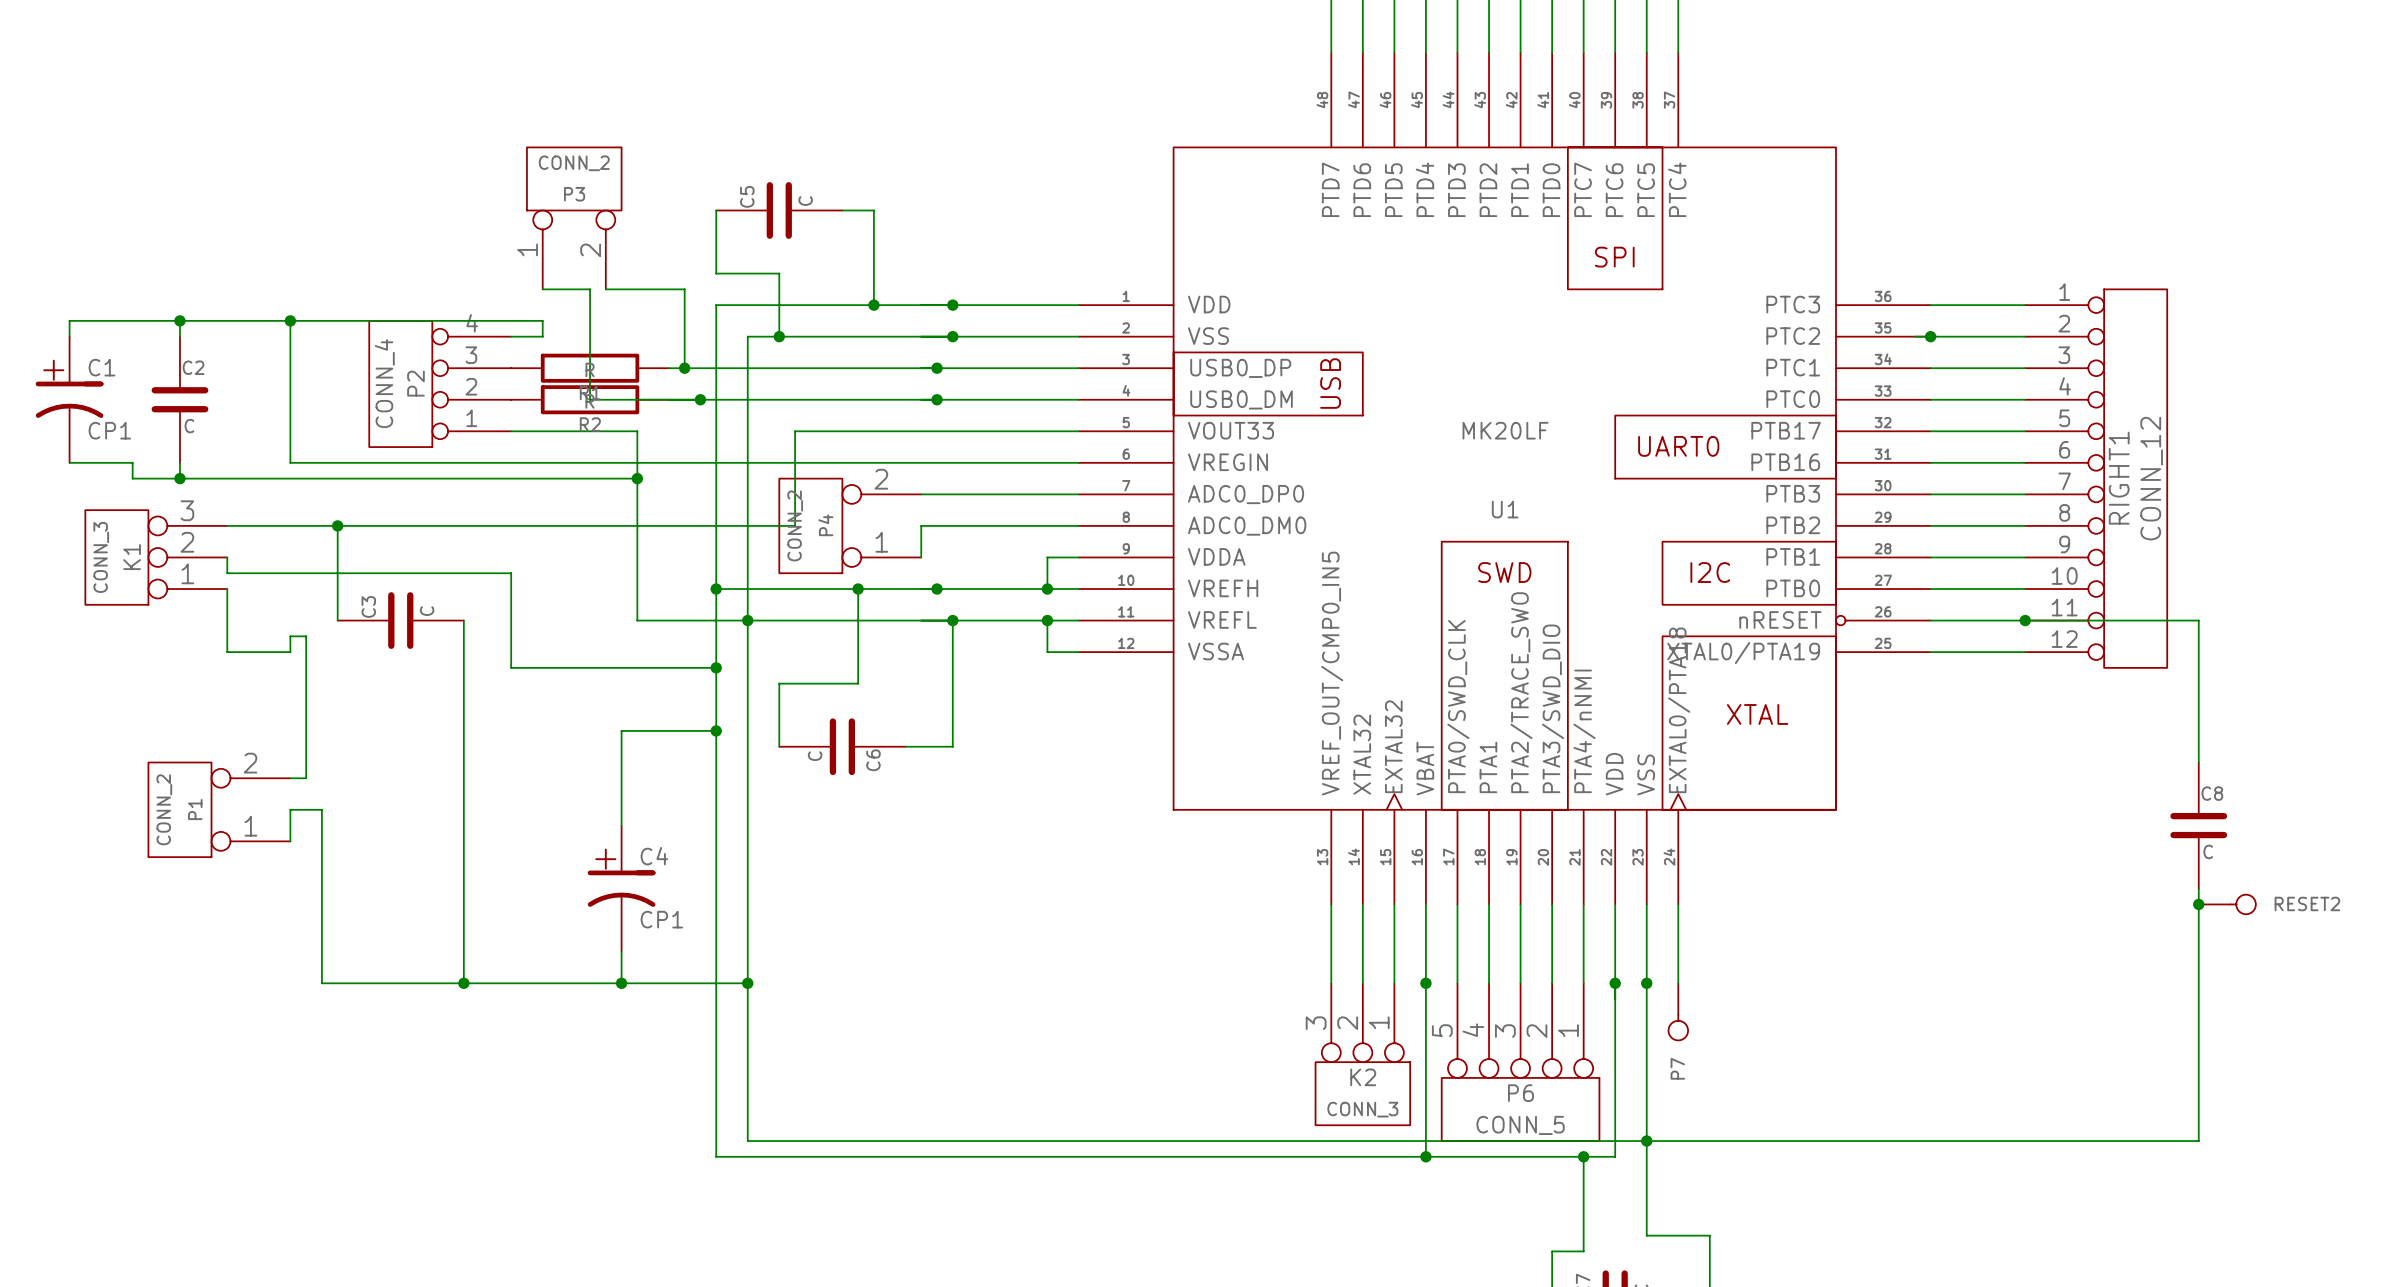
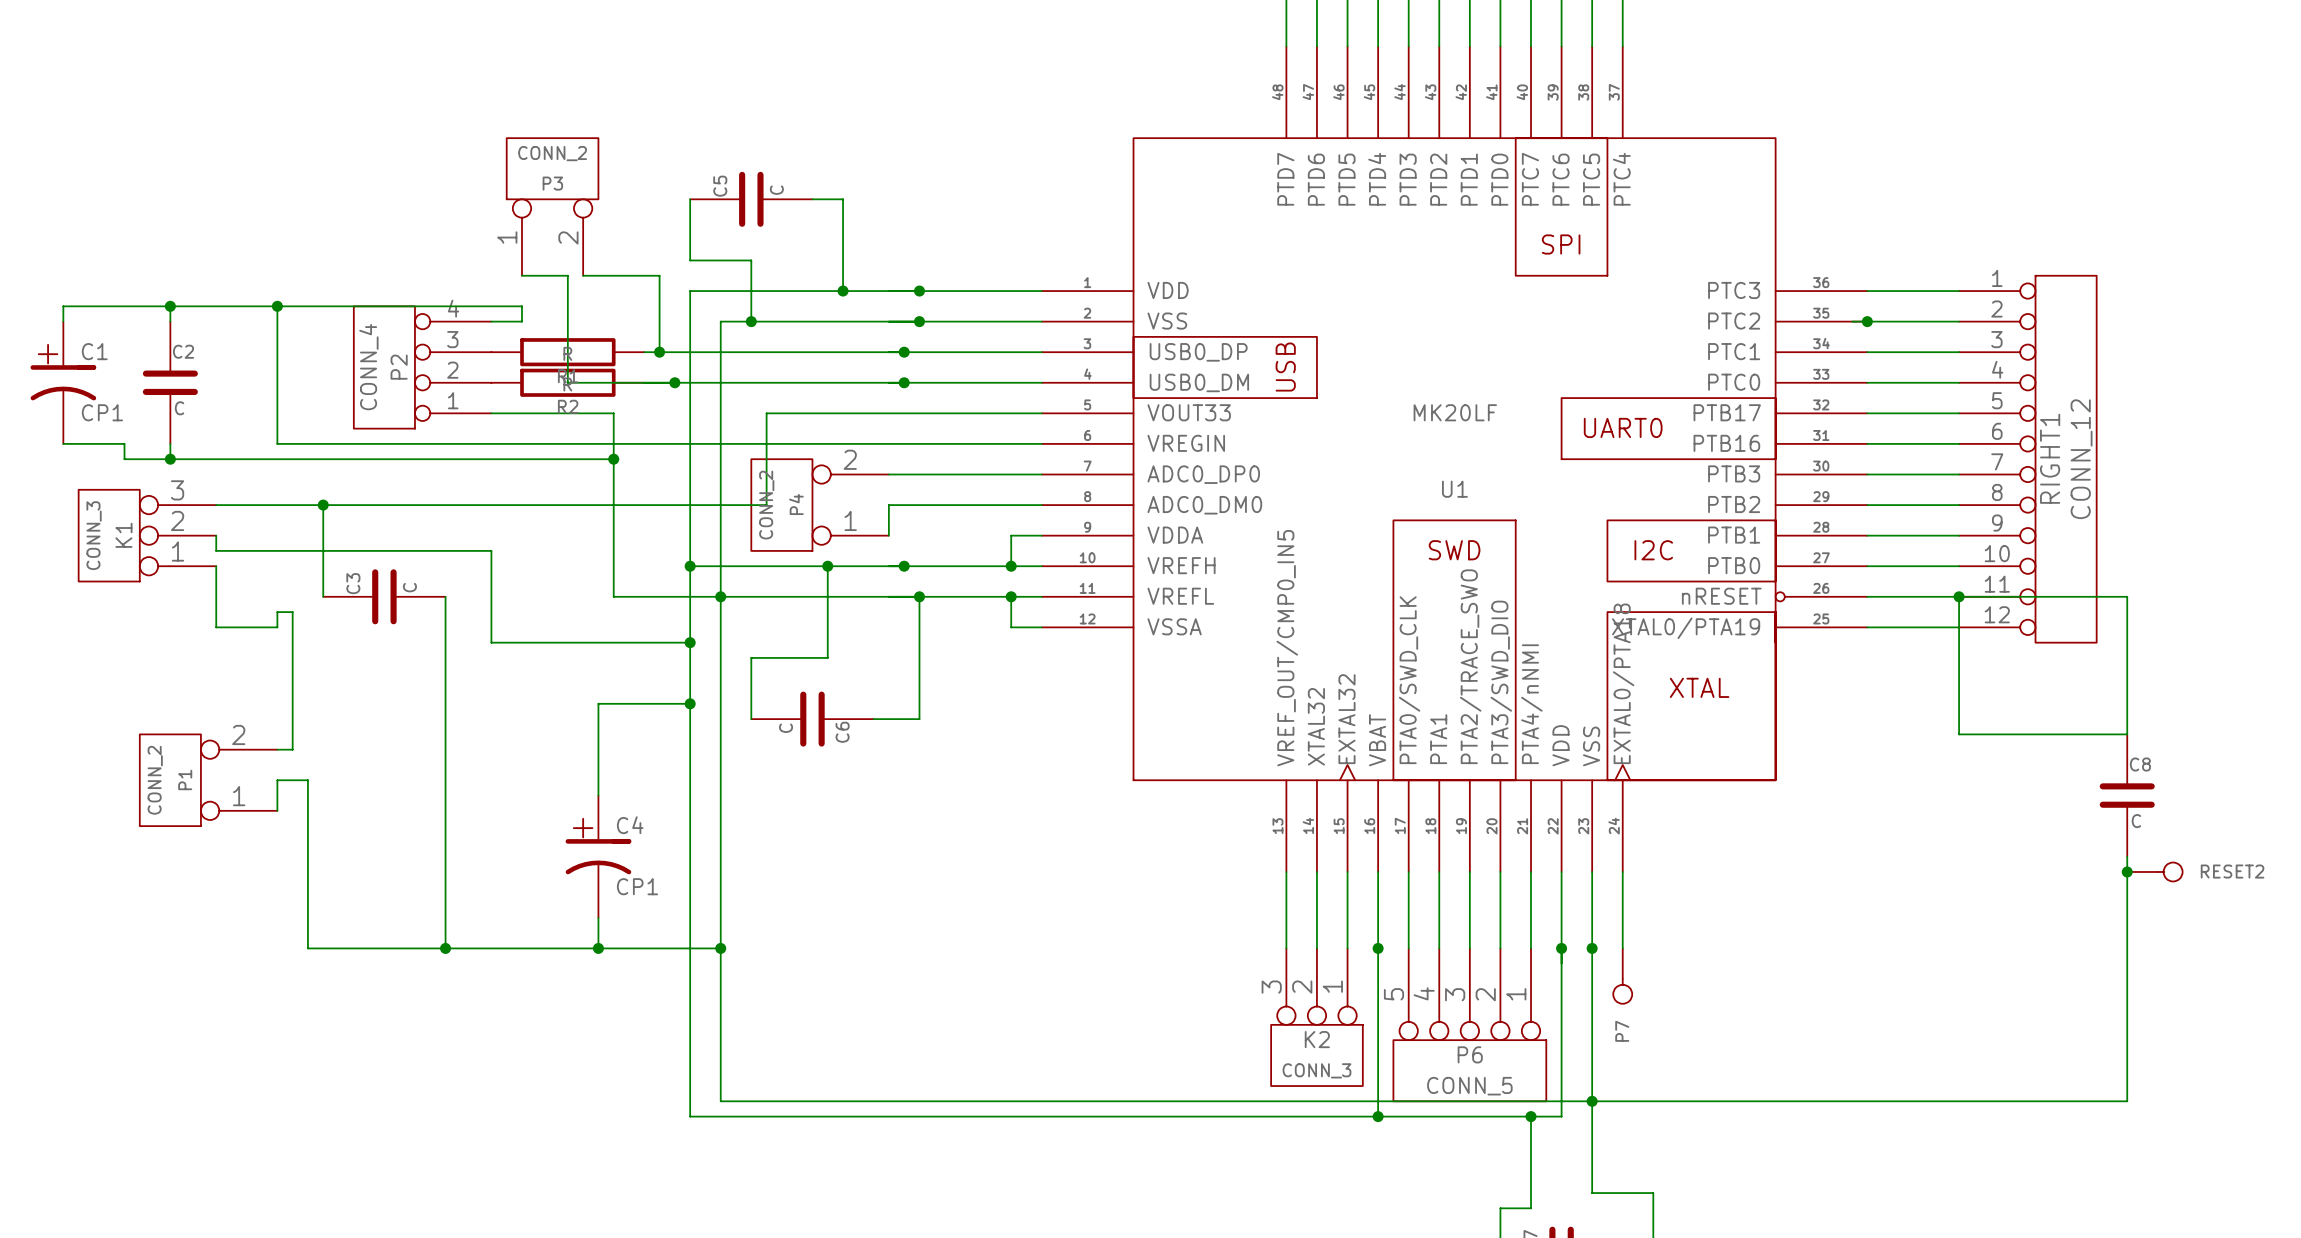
wire: none -> (1959, 596) (1959, 734) (2127, 734)

